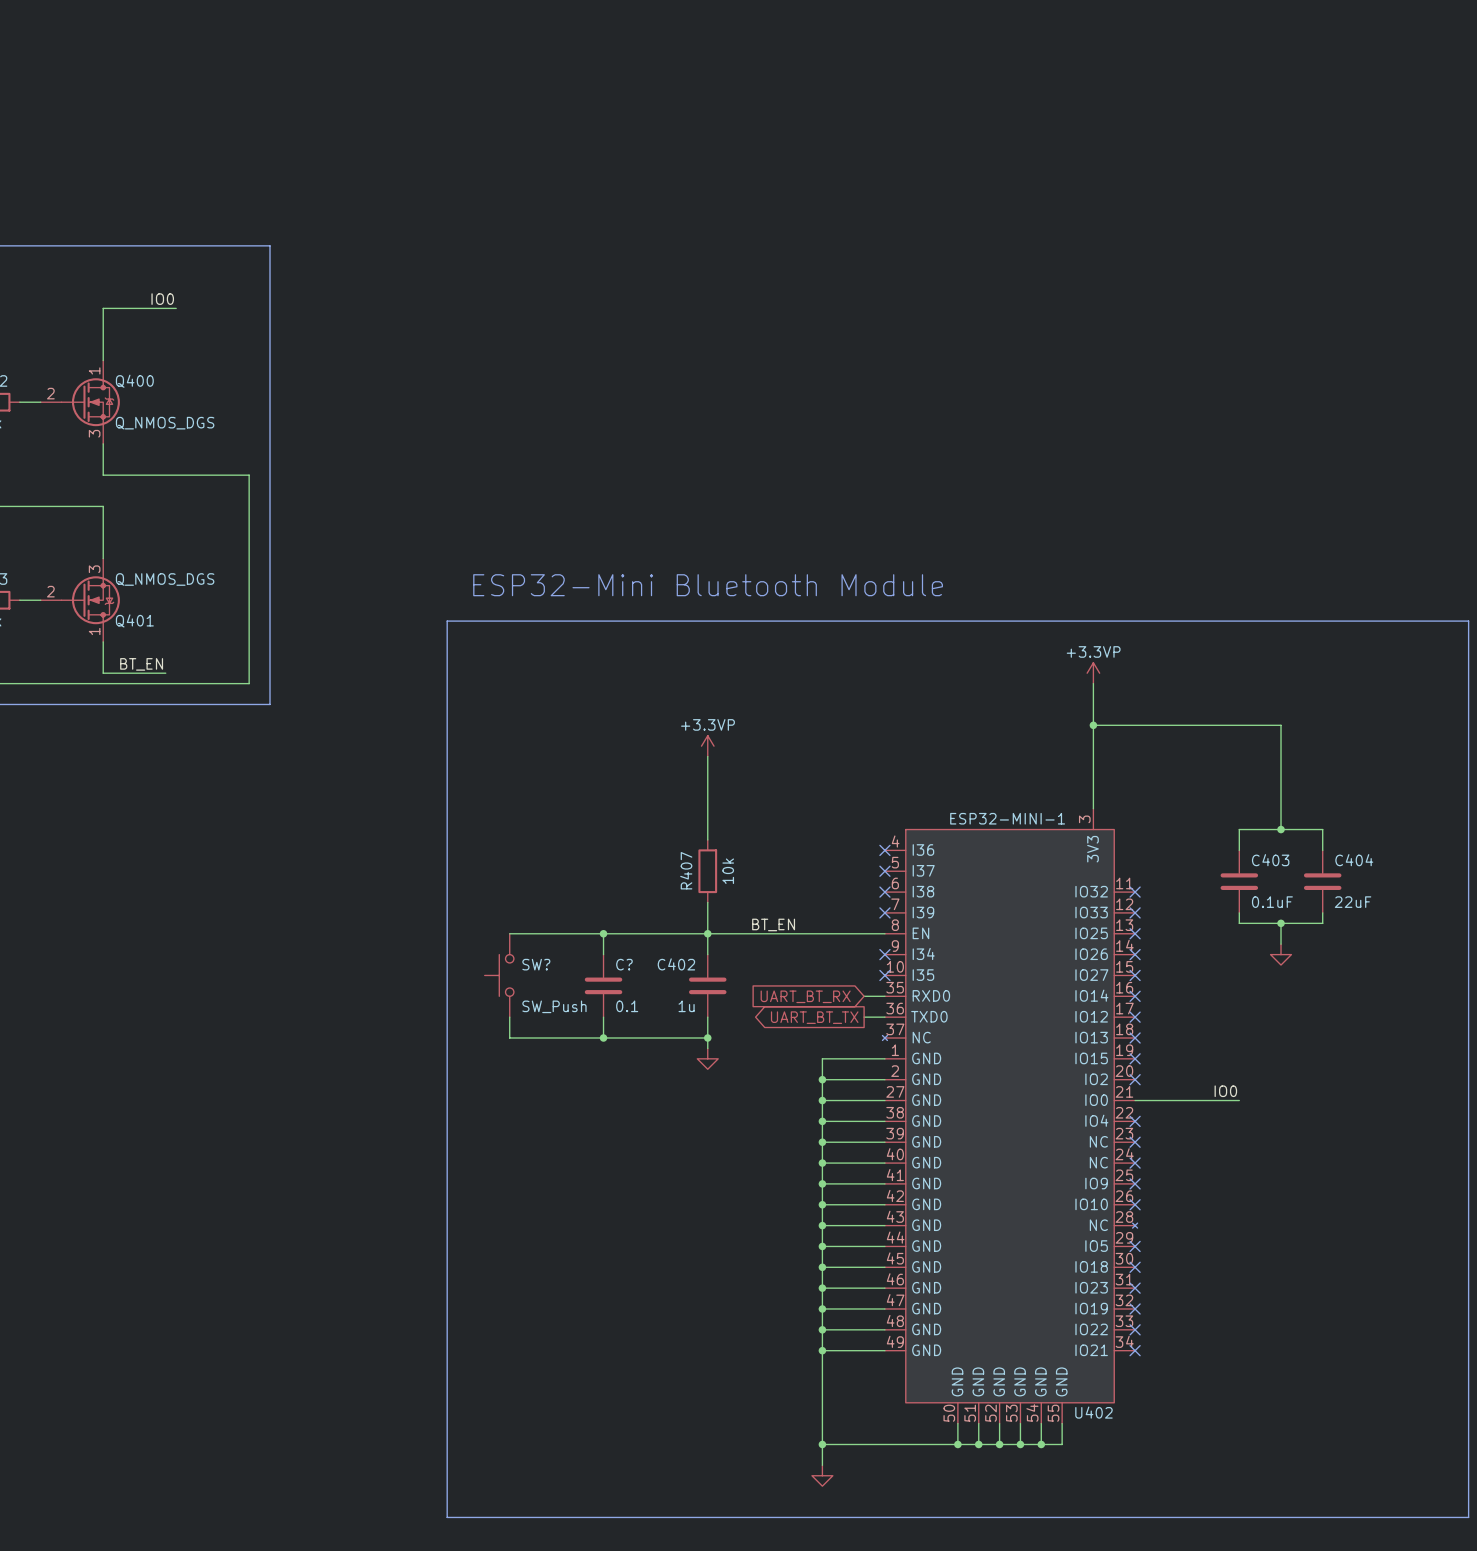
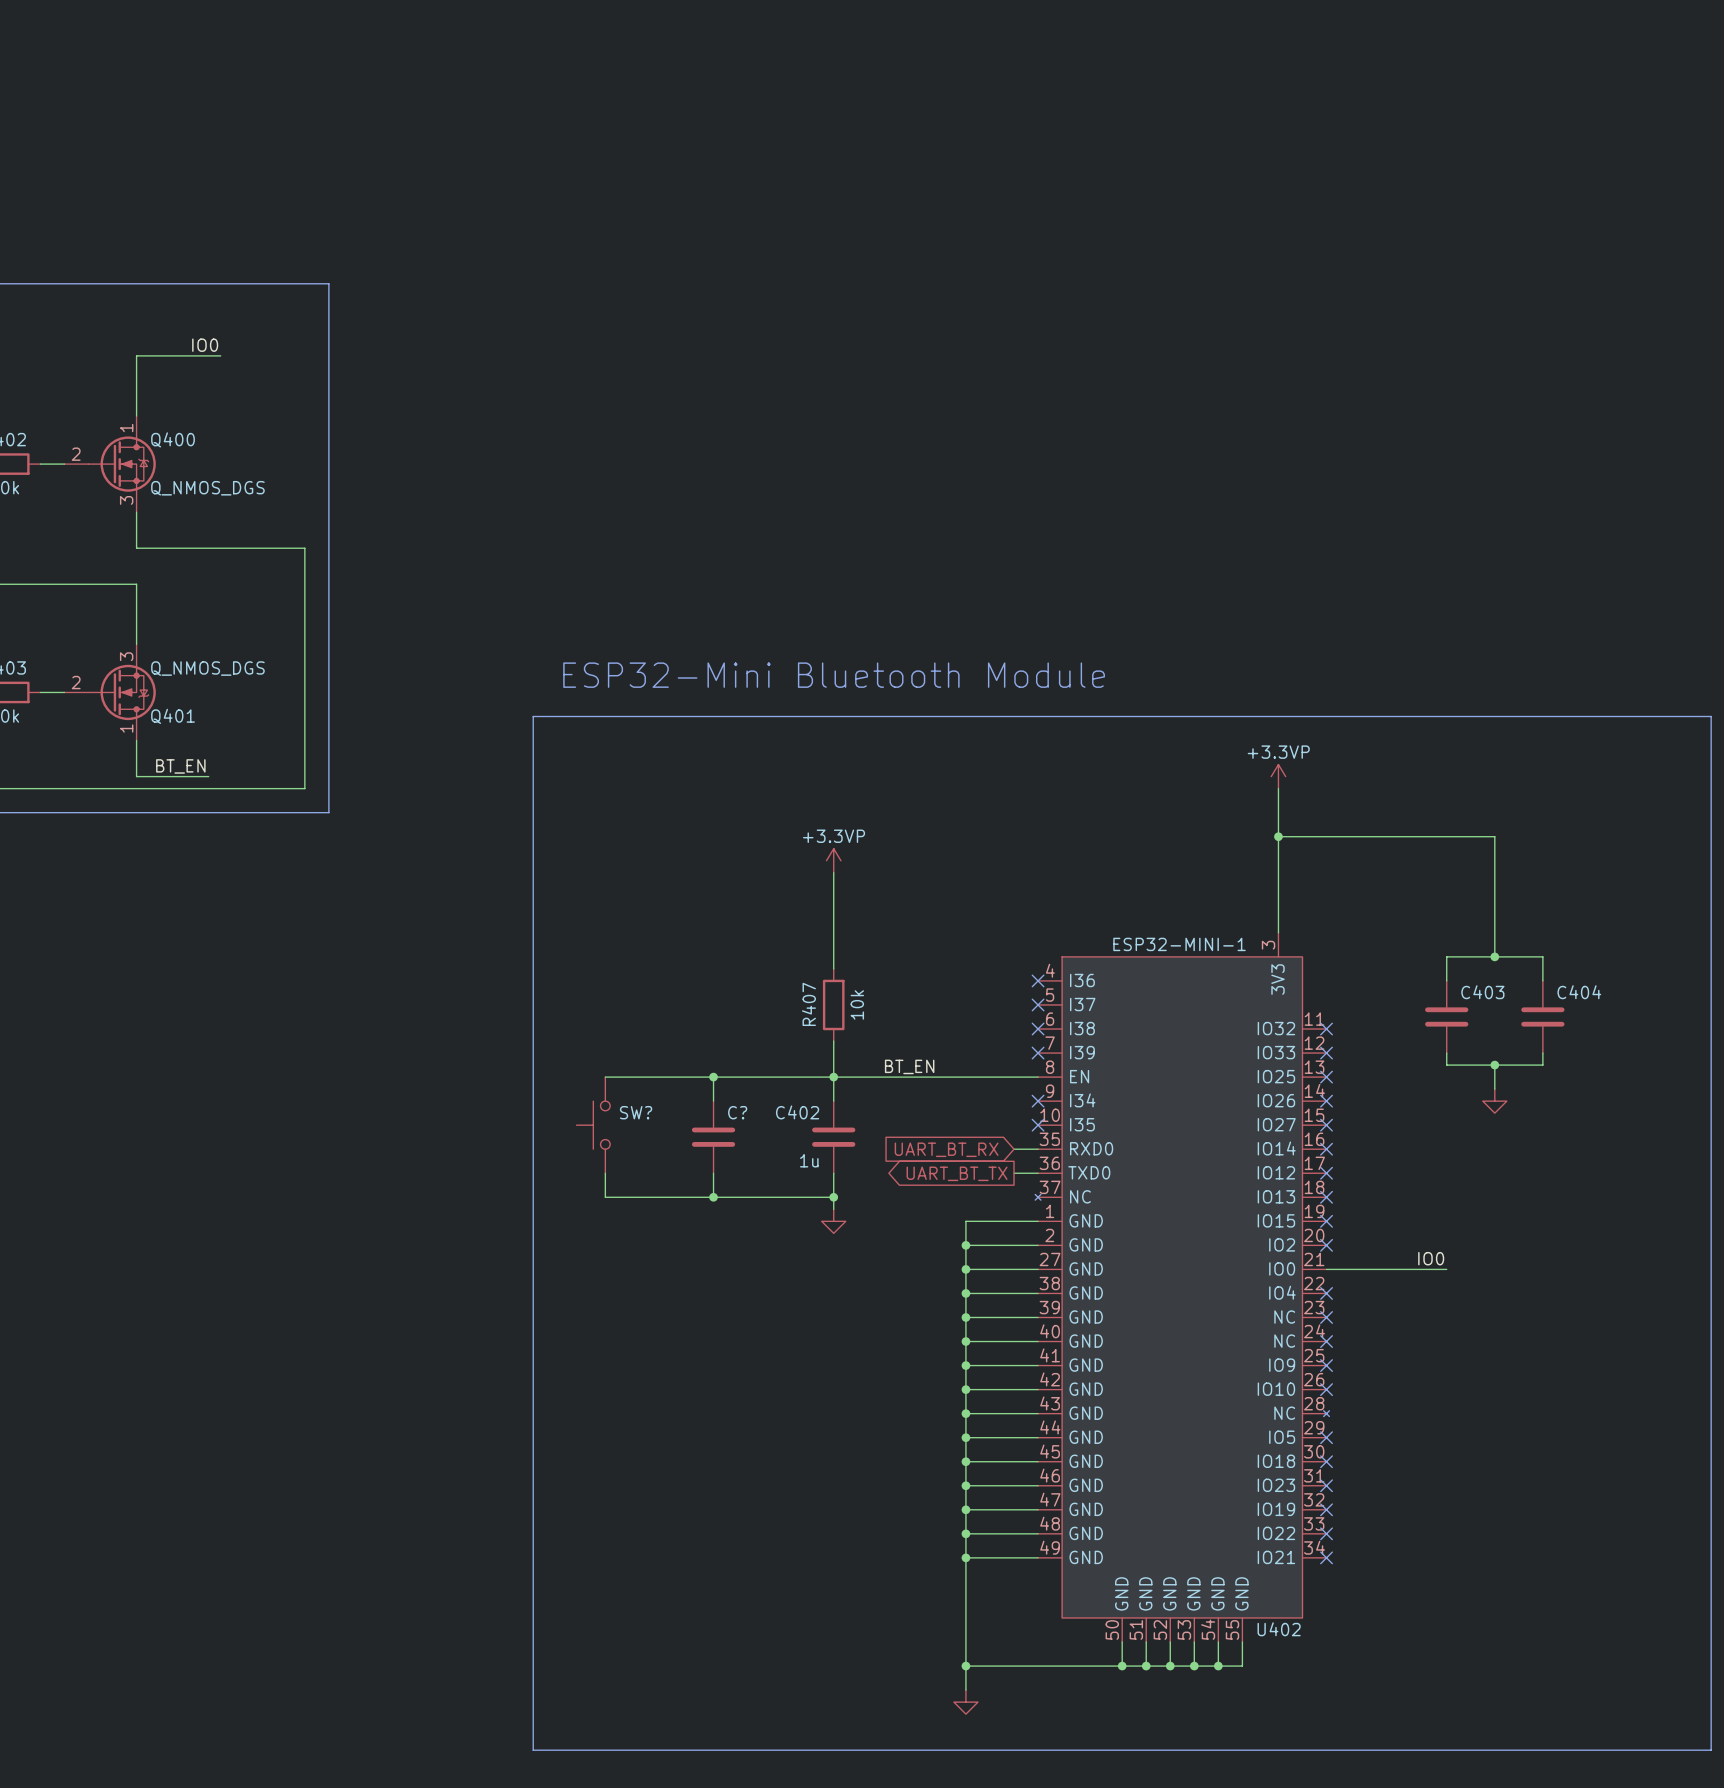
C403 value: 0.1uF (1272, 902) -> none
C404 value: 22uF (1353, 902) -> none
SW? value: SW_Push (554, 1006) -> none
C? value: 0.1 (627, 1006) -> none

